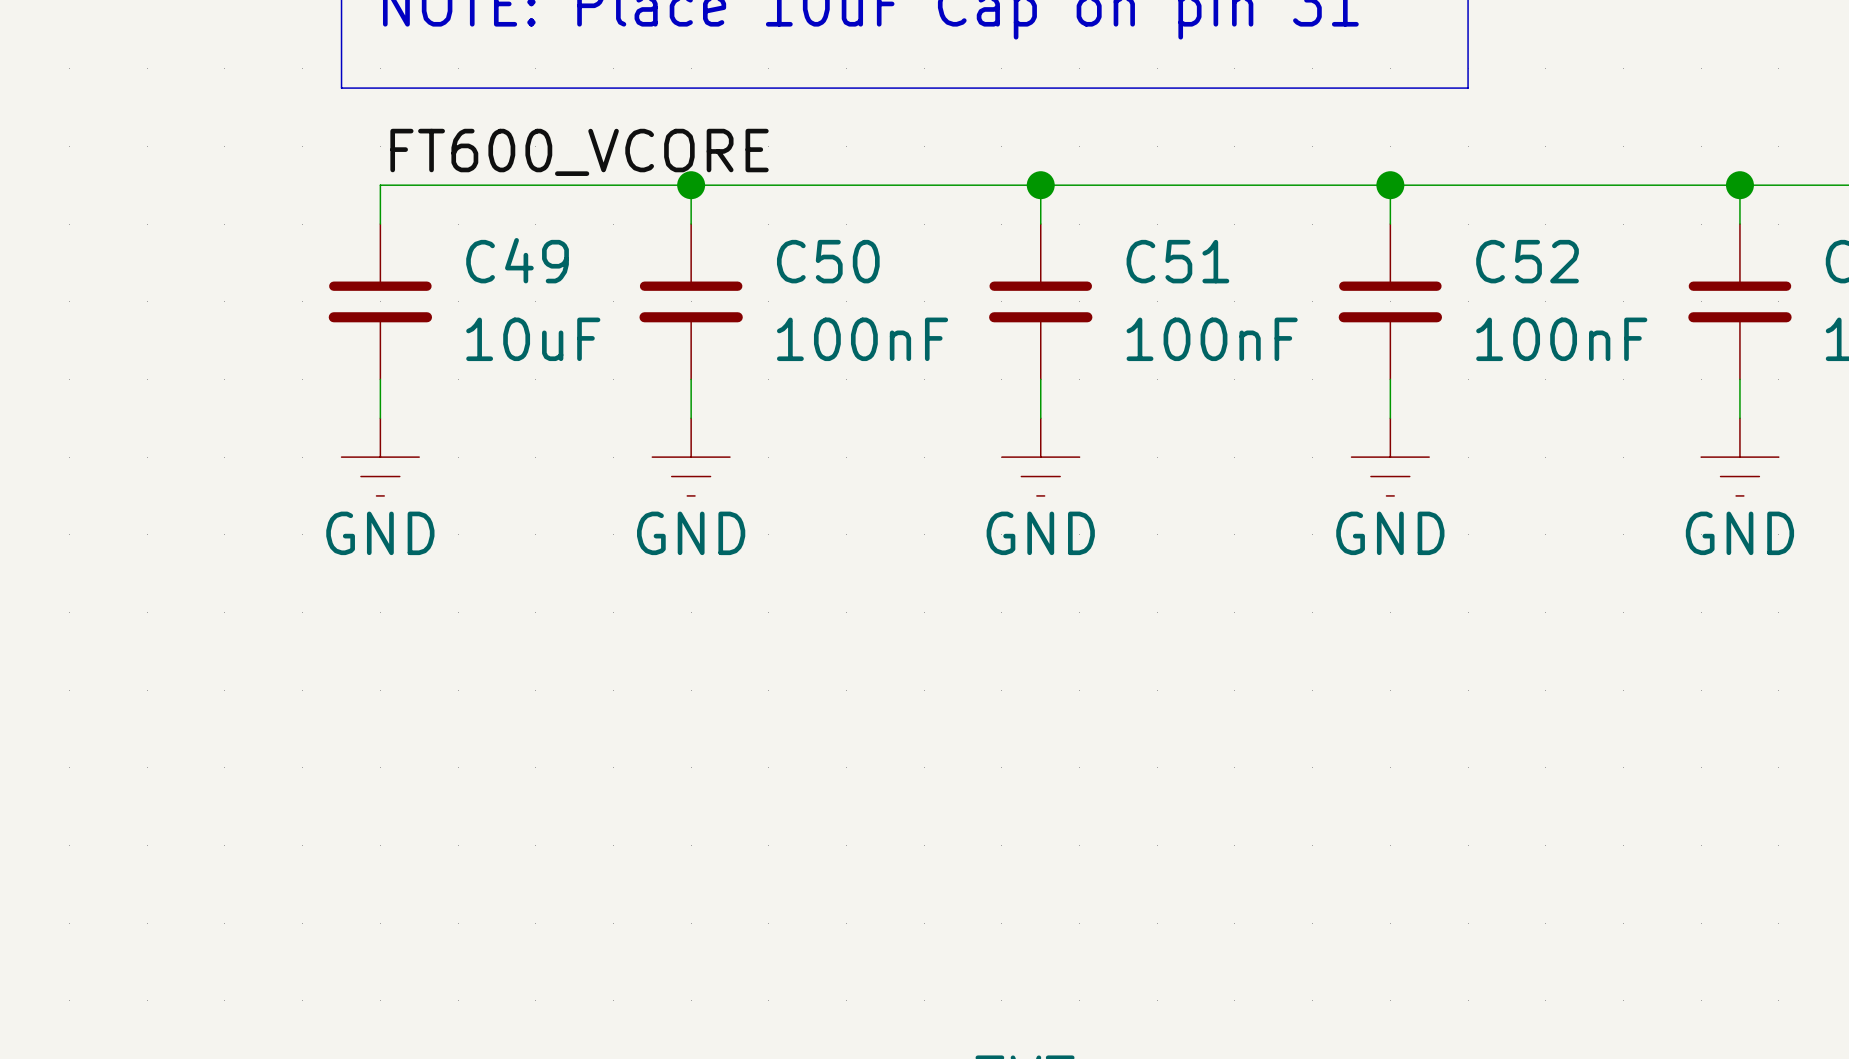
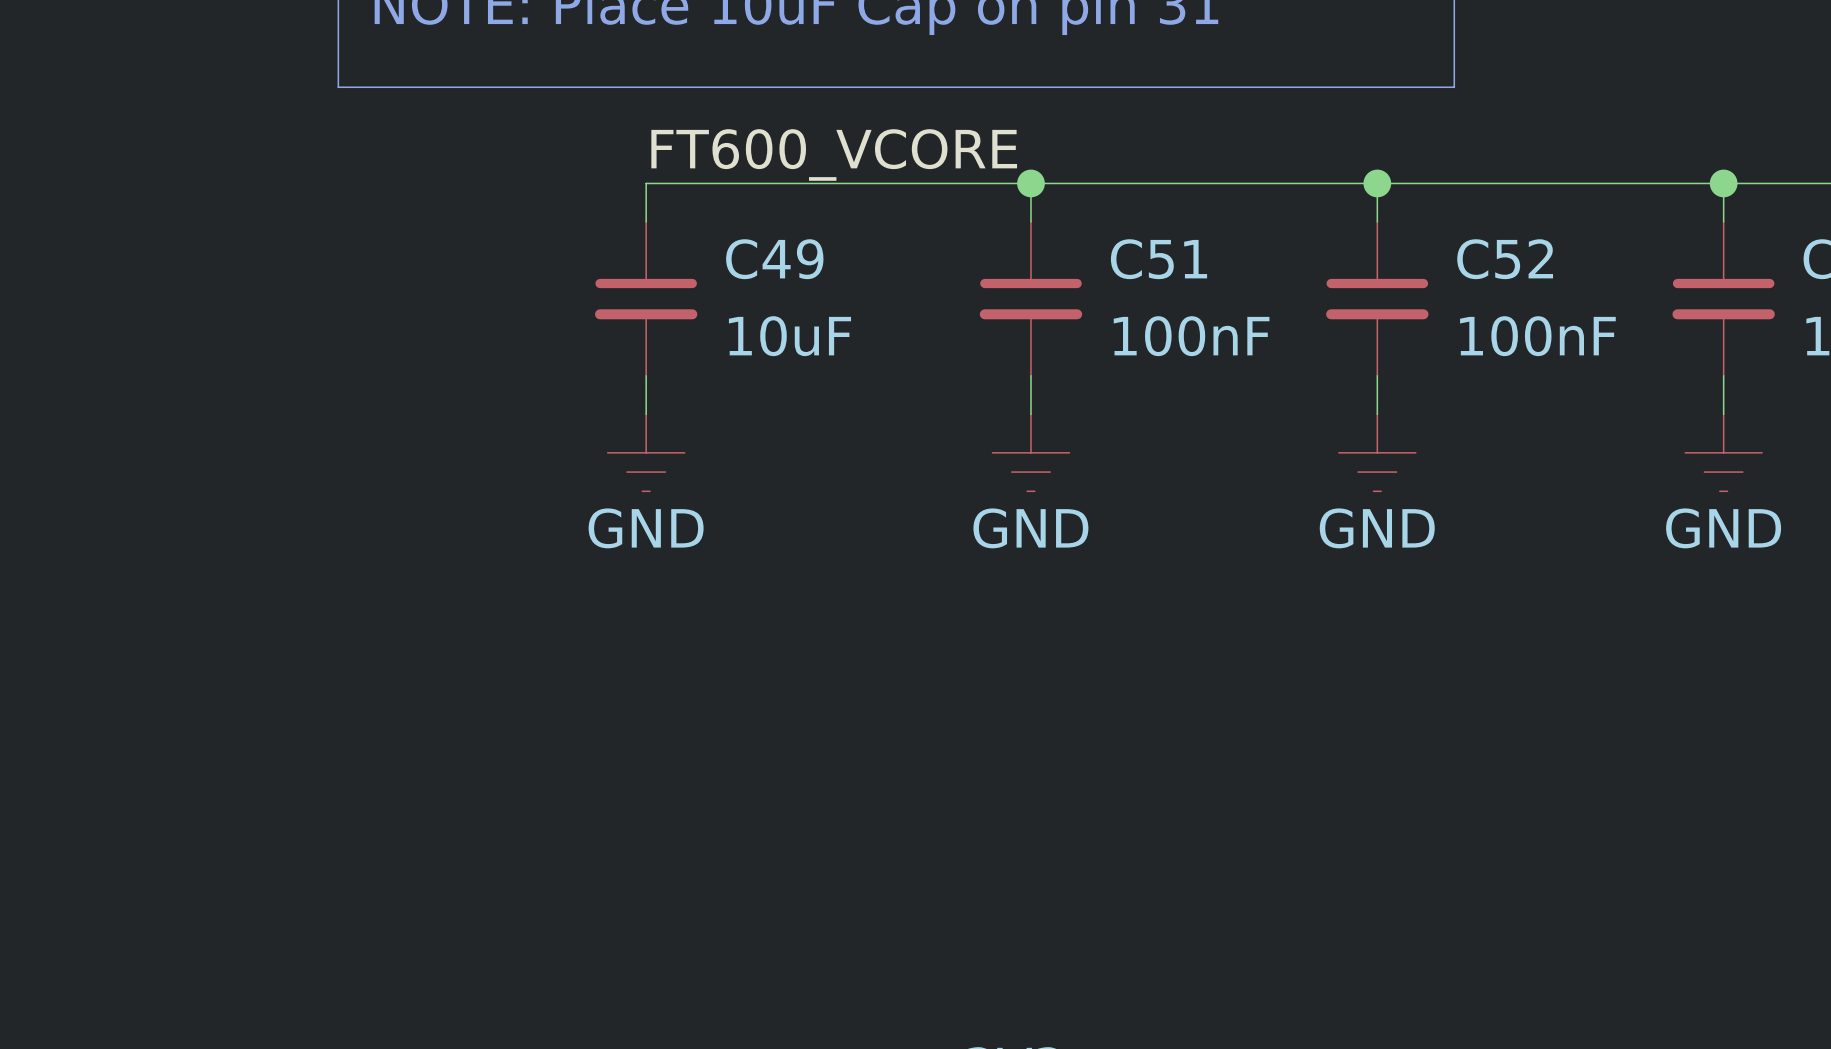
label position: FT600_VCORE (579, 152) -> FT600_VCORE (834, 154)
wire: (652, 185) (380, 185) (380, 224) -> (646, 183) (646, 221)
wire: (691, 185) (691, 224) -> none
junction: (691, 185) -> none
C49 position: (380, 301) -> (646, 298)
C50: 100nF (691, 301) -> none
wire: (380, 379) (380, 418) -> none
wire: (691, 379) (691, 418) -> (646, 375) (646, 414)
power symbol: GND (380, 457) -> none
power symbol position: GND (691, 457) -> GND (646, 452)

